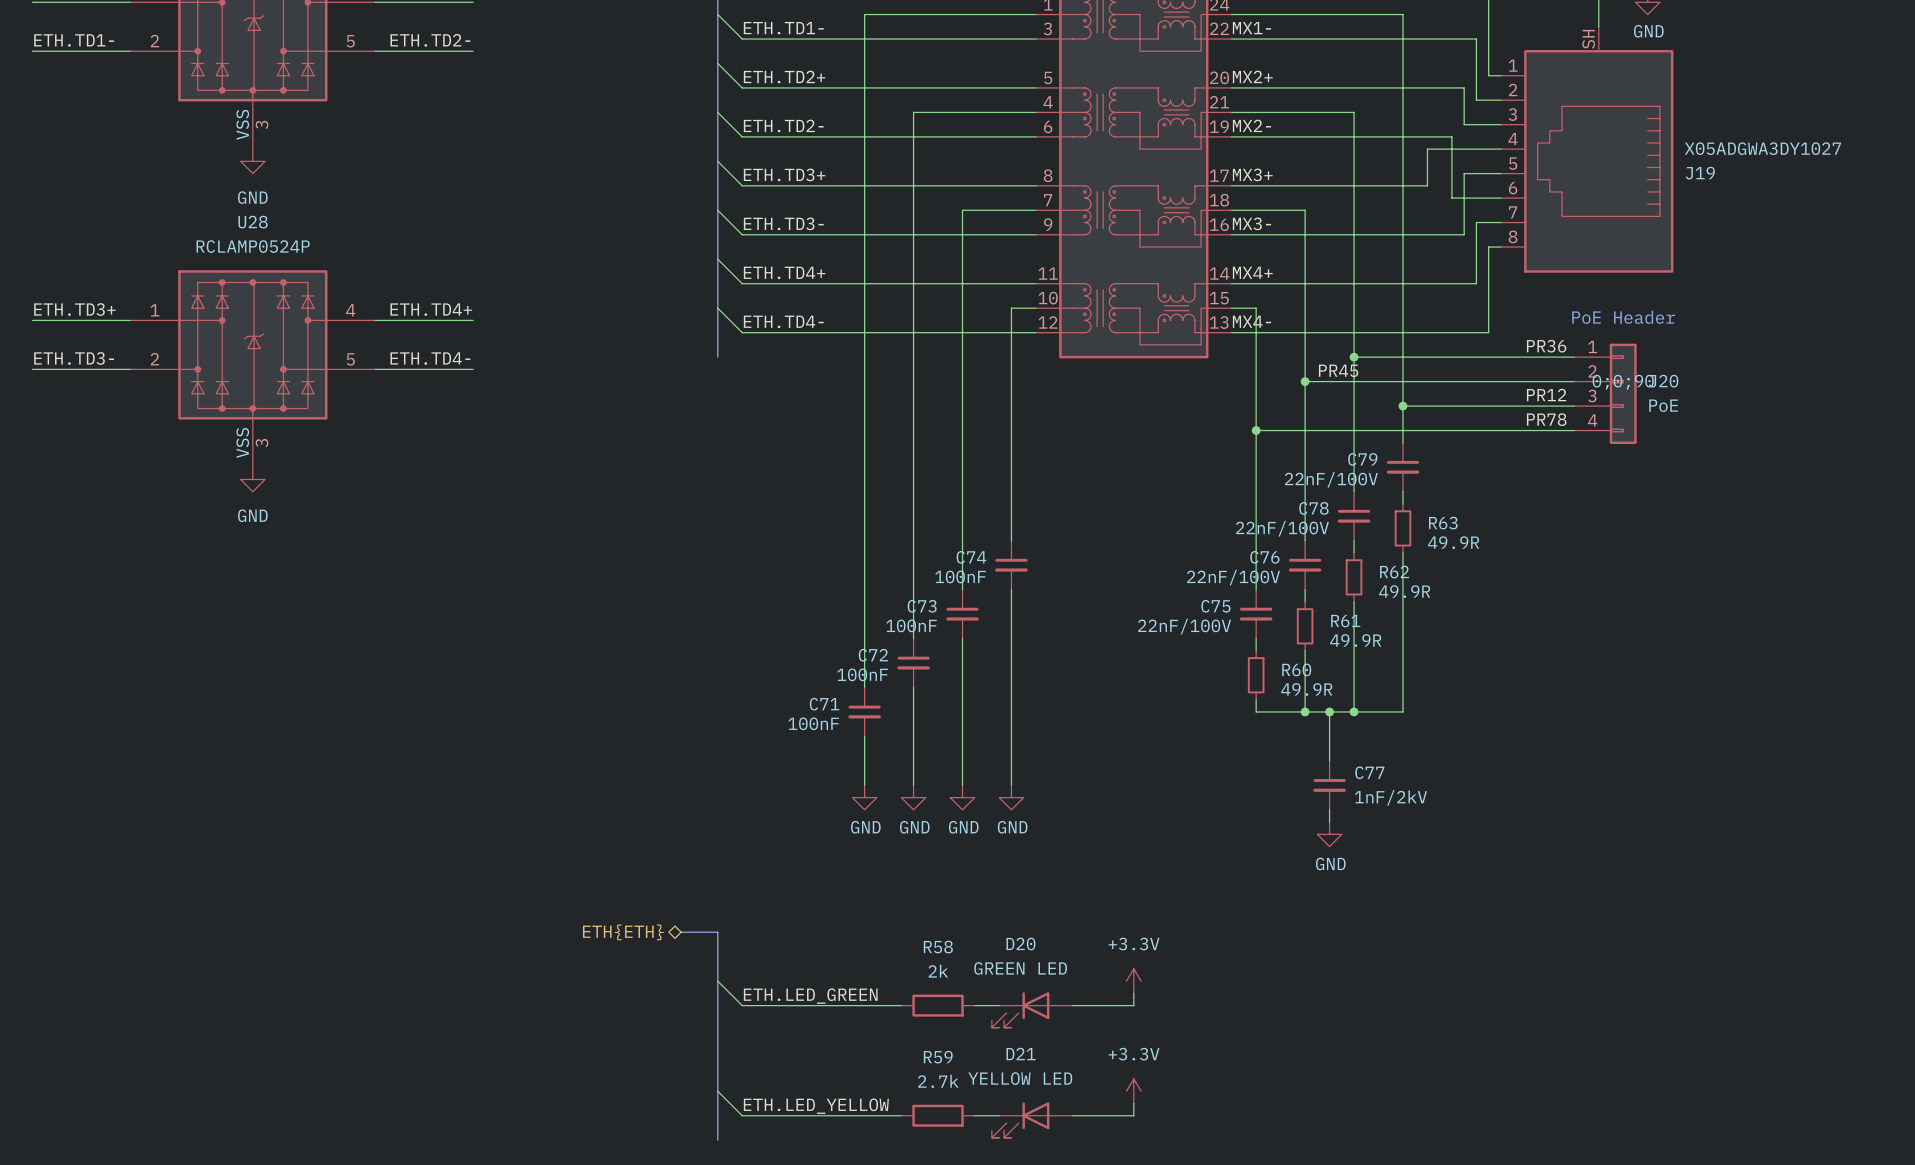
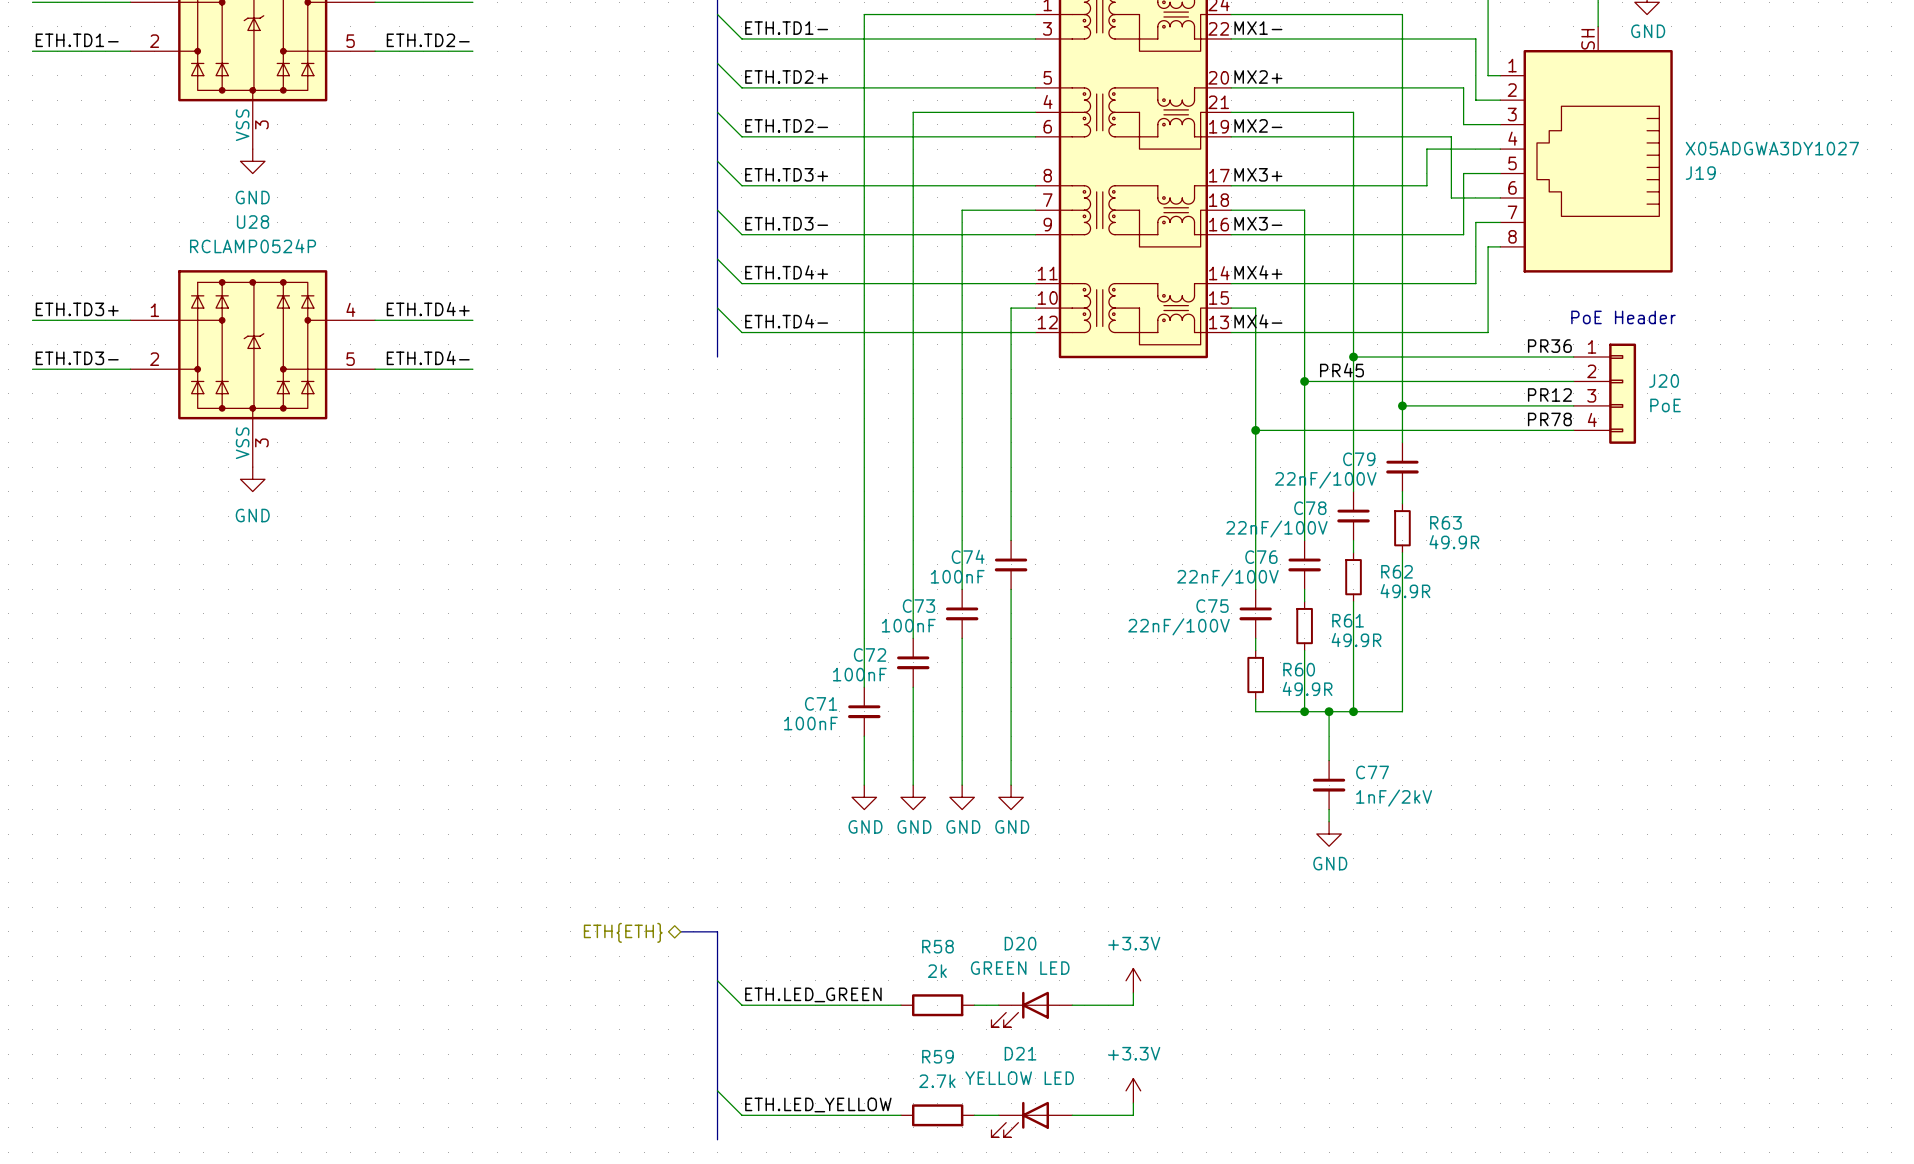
J20 text: 0;0;90 (1623, 382) -> none

